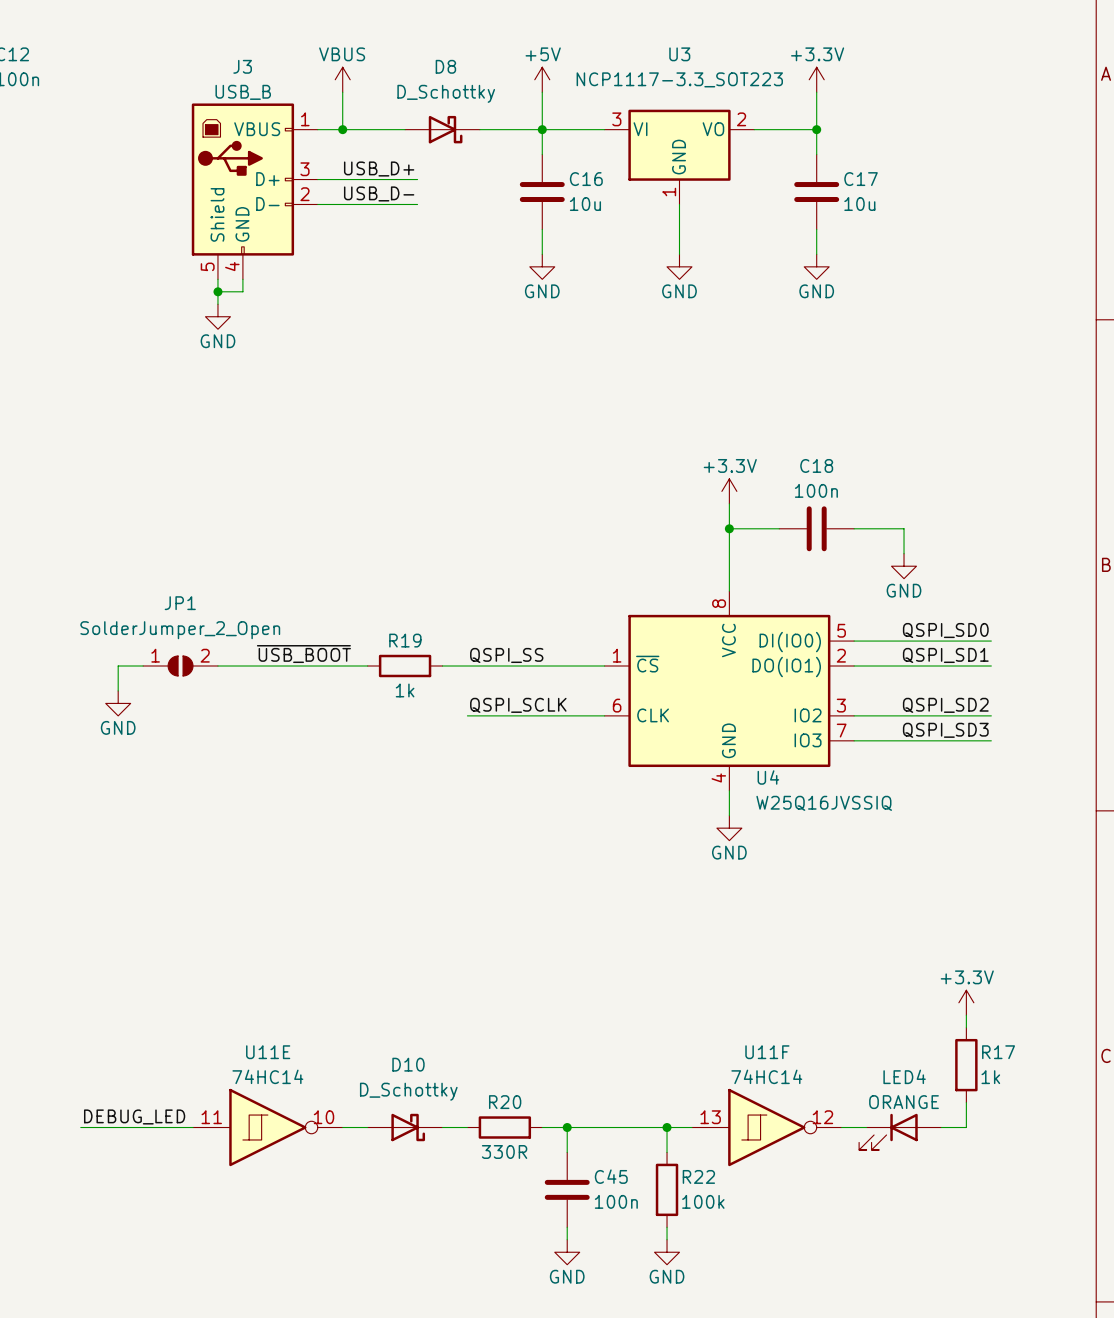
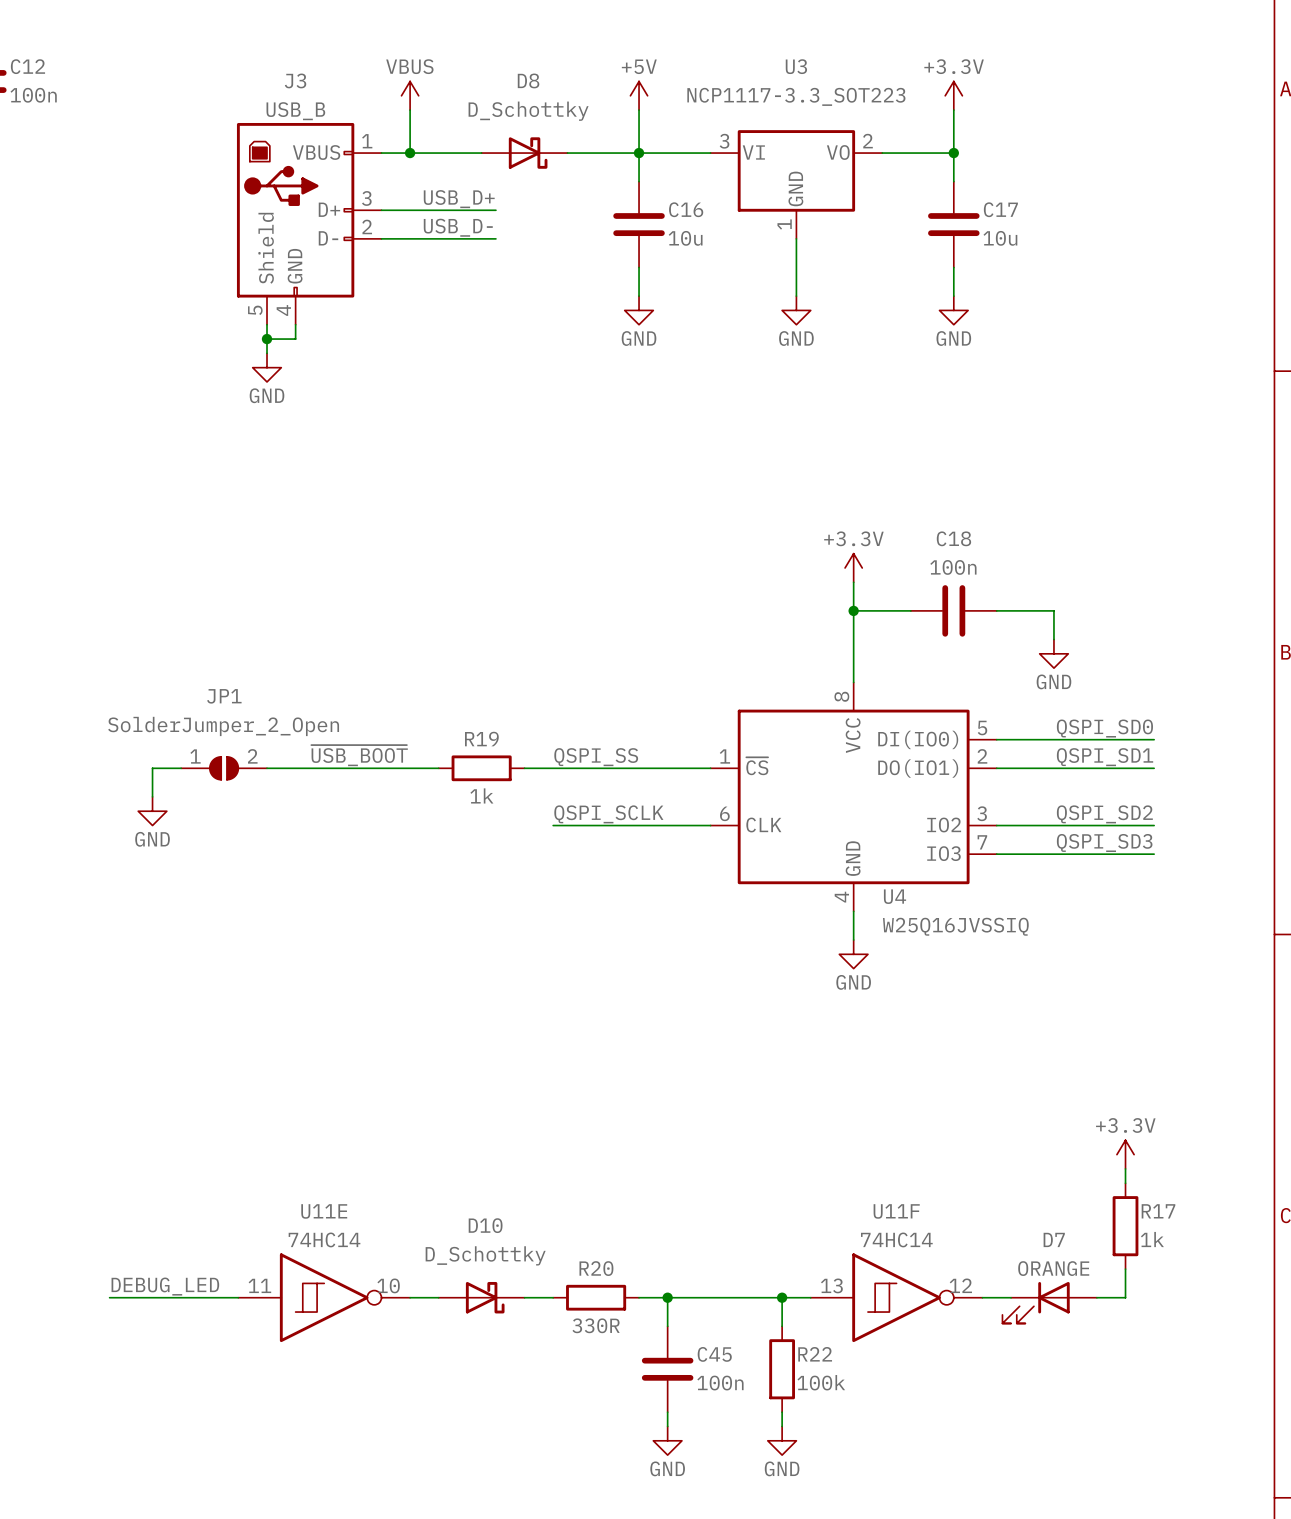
LED4 name: LED4 (904, 1076) -> D7 (1054, 1239)

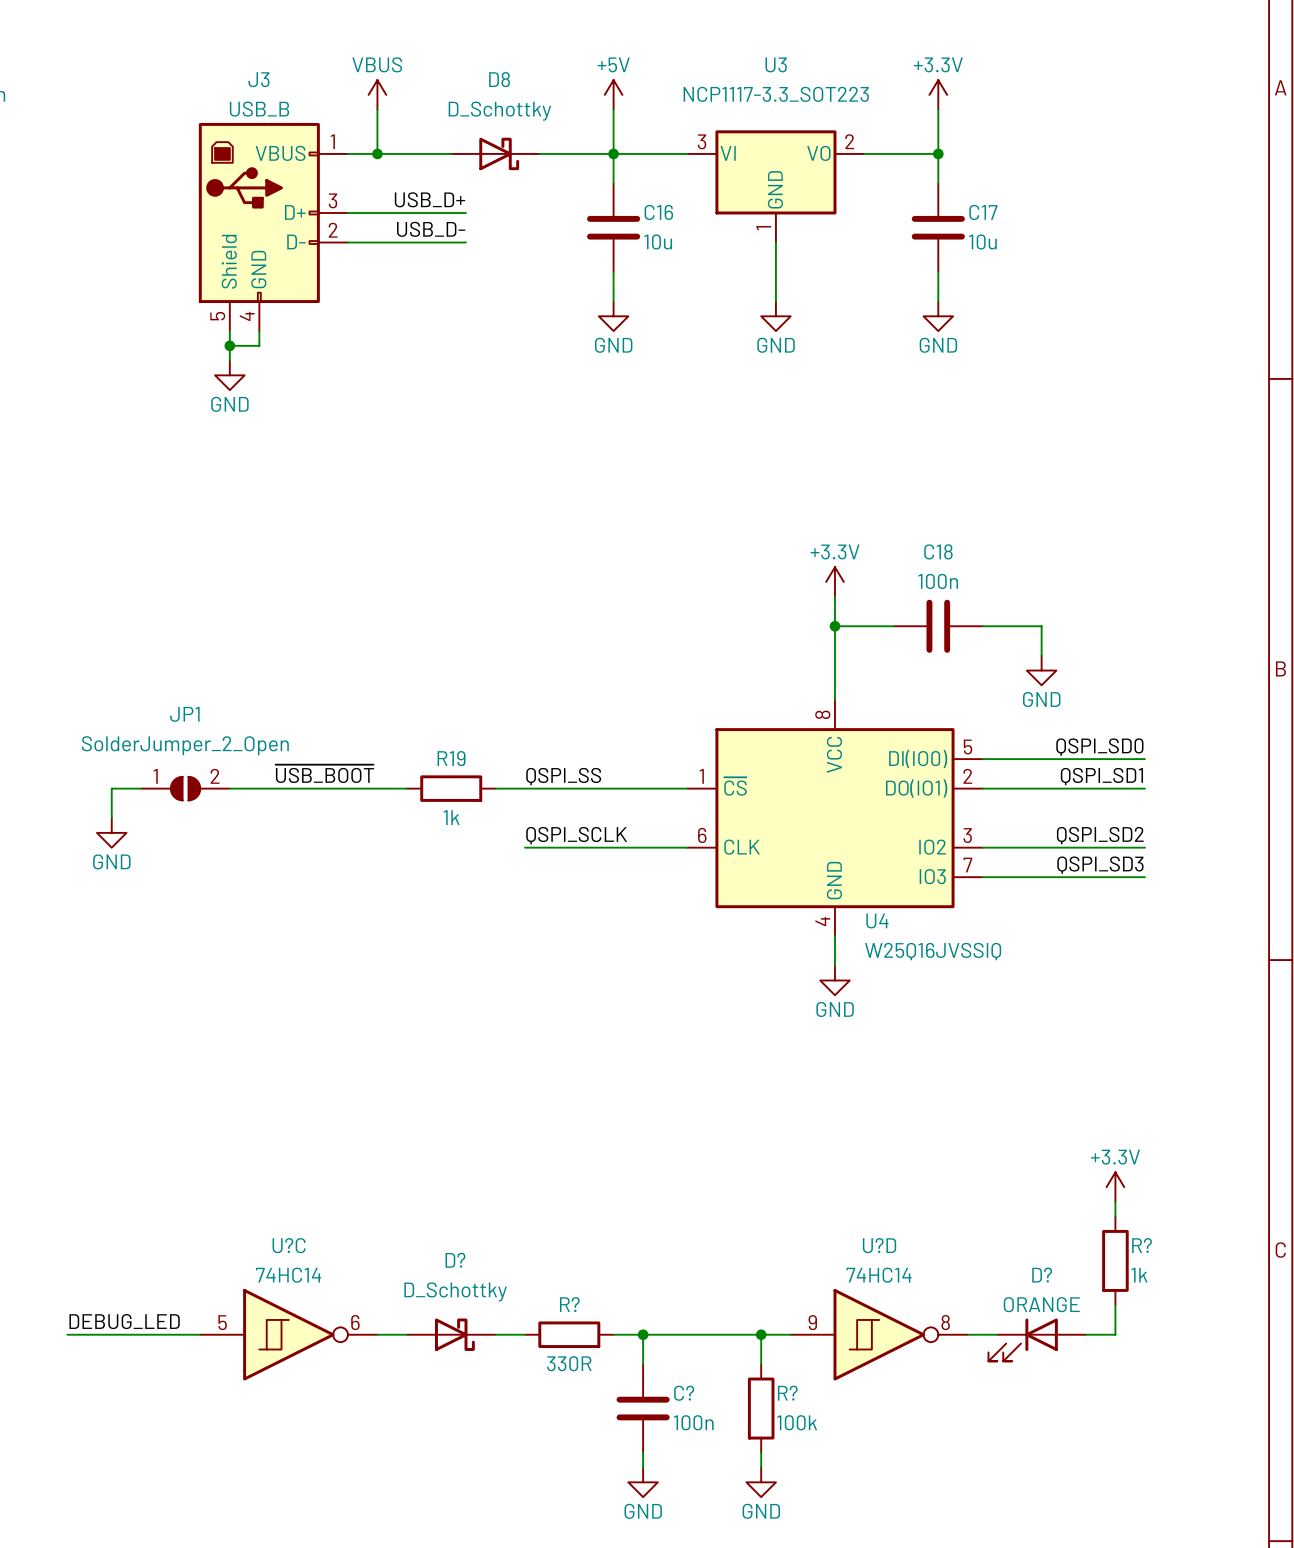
U11E name: U11E (324, 1211) -> U?C (289, 1245)
U11F name: U11F (896, 1211) -> U?D (879, 1245)
R17 name: R17 (1158, 1211) -> R? (1142, 1245)
D10 name: D10 (485, 1225) -> D? (455, 1260)
D7 name: D7 (1054, 1239) -> D? (1042, 1275)
R20 name: R20 (596, 1268) -> R? (569, 1304)
U11E pin number: 11 (259, 1285) -> 5 (222, 1322)
U11E pin number: 10 (388, 1285) -> 6 (355, 1322)
U11F pin number: 13 (831, 1285) -> 9 (812, 1322)
U11F pin number: 12 (960, 1285) -> 8 (945, 1322)
C45 name: C45 (714, 1354) -> C? (684, 1393)
R22 name: R22 (815, 1354) -> R? (787, 1393)

